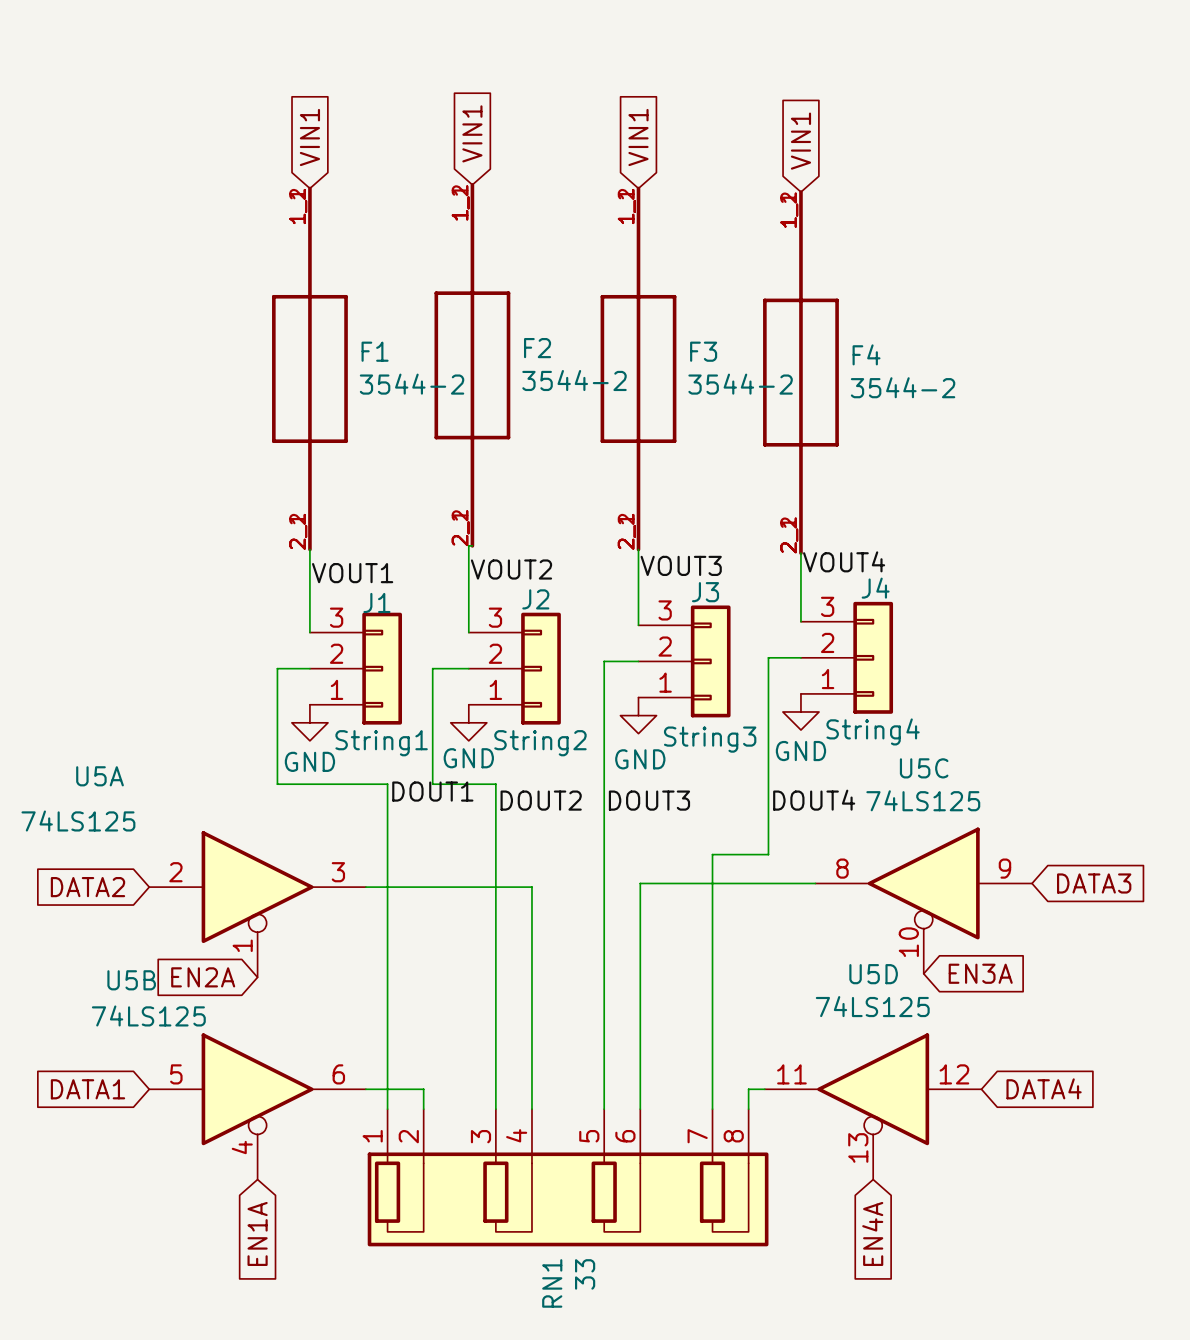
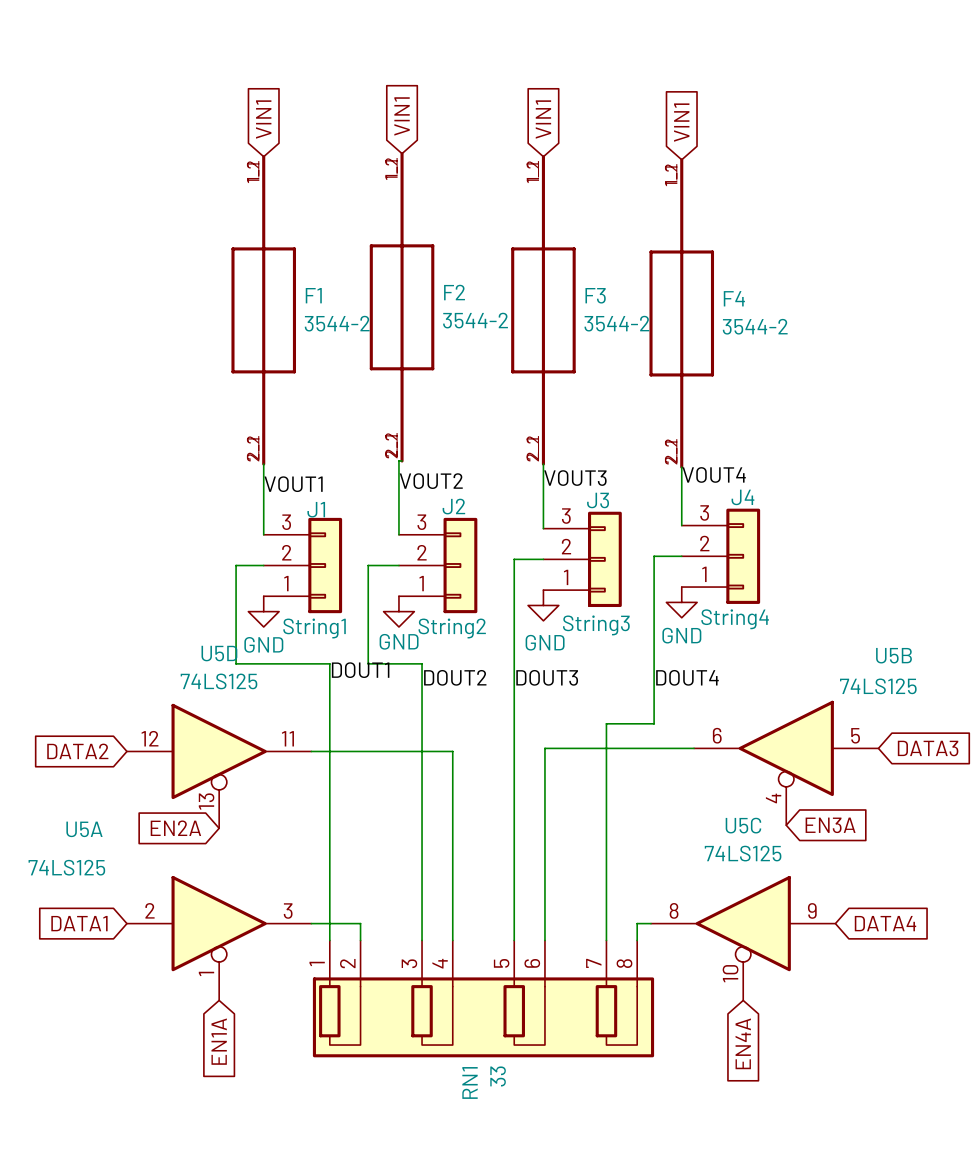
U5C position: (923, 900) -> (743, 938)
U5A position: (257, 904) -> (219, 938)
U5B flip: as is (257, 1089) -> left-right (786, 748)
U5D flip: as is (873, 1089) -> left-right (219, 751)
U5B position: (257, 1106) -> (786, 763)
U5D position: (873, 1106) -> (219, 766)

